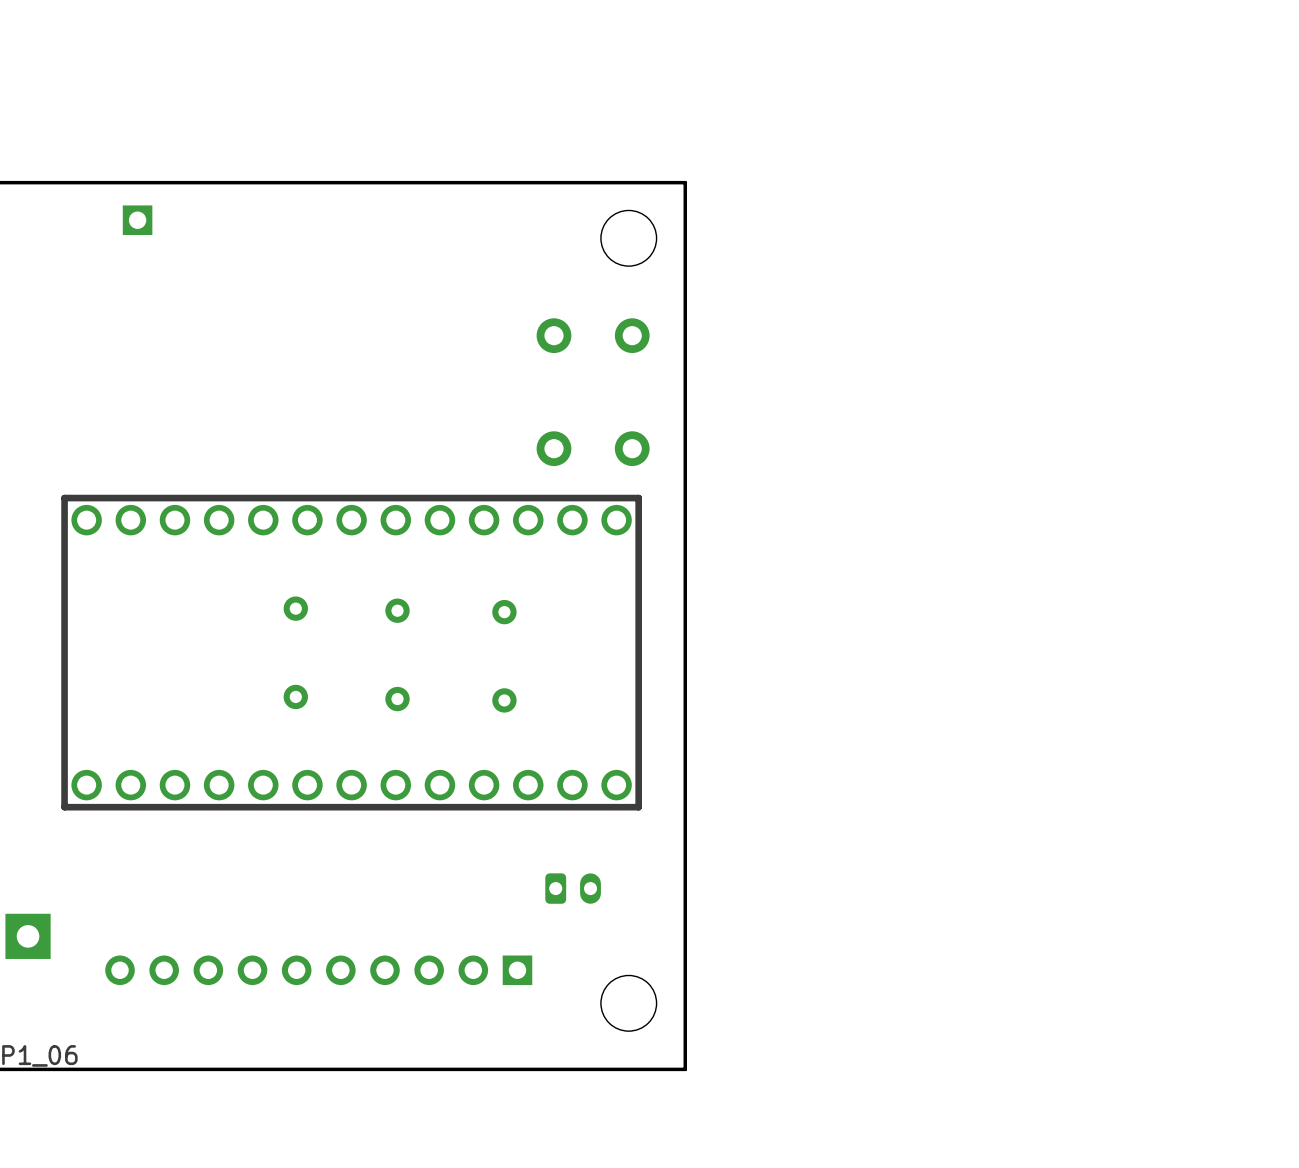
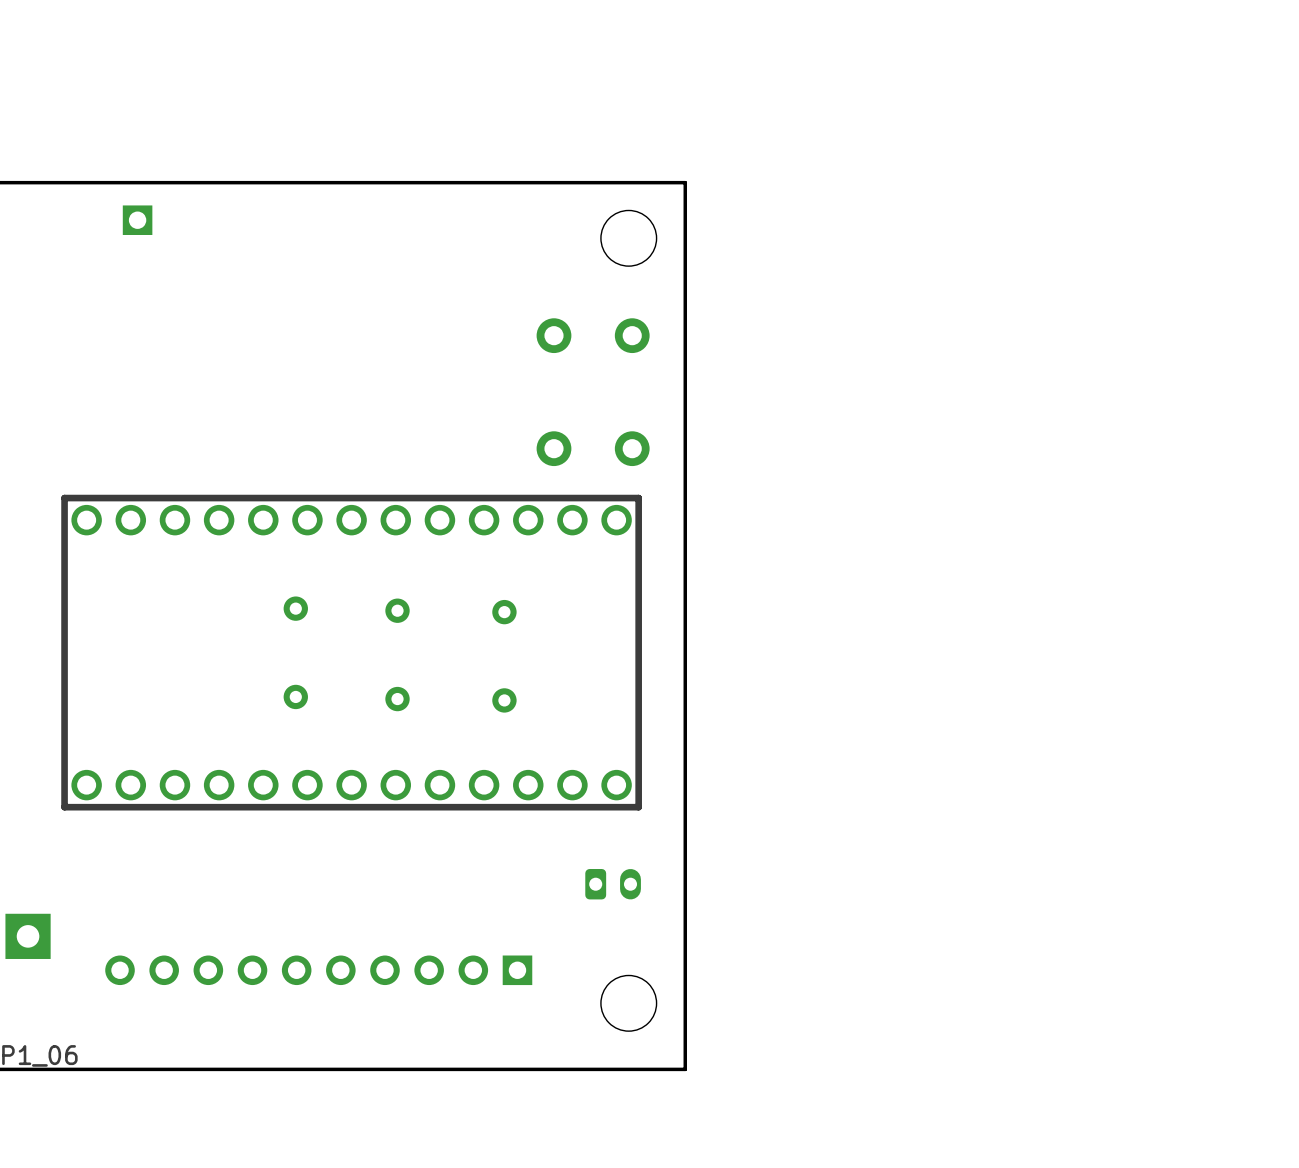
part position: (573, 888) -> (613, 884)

